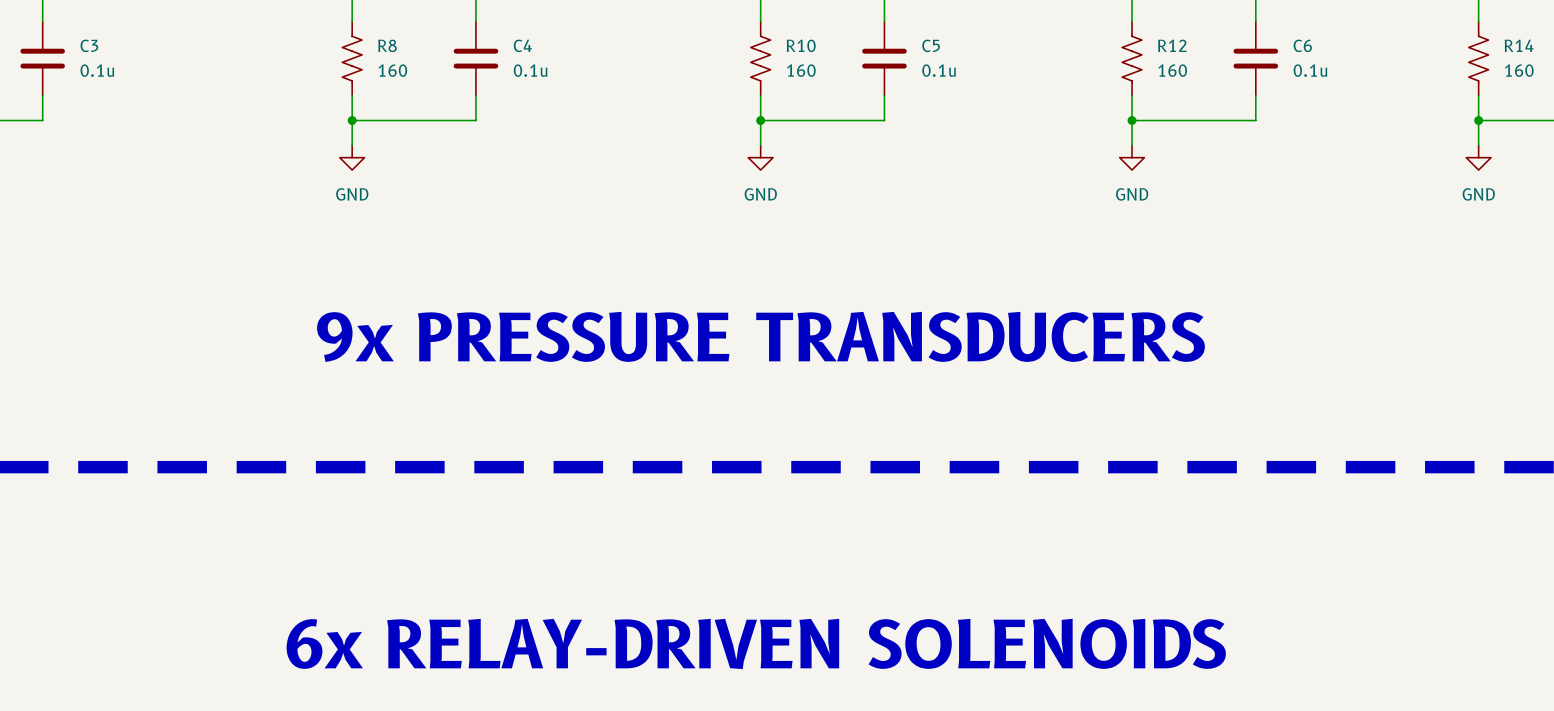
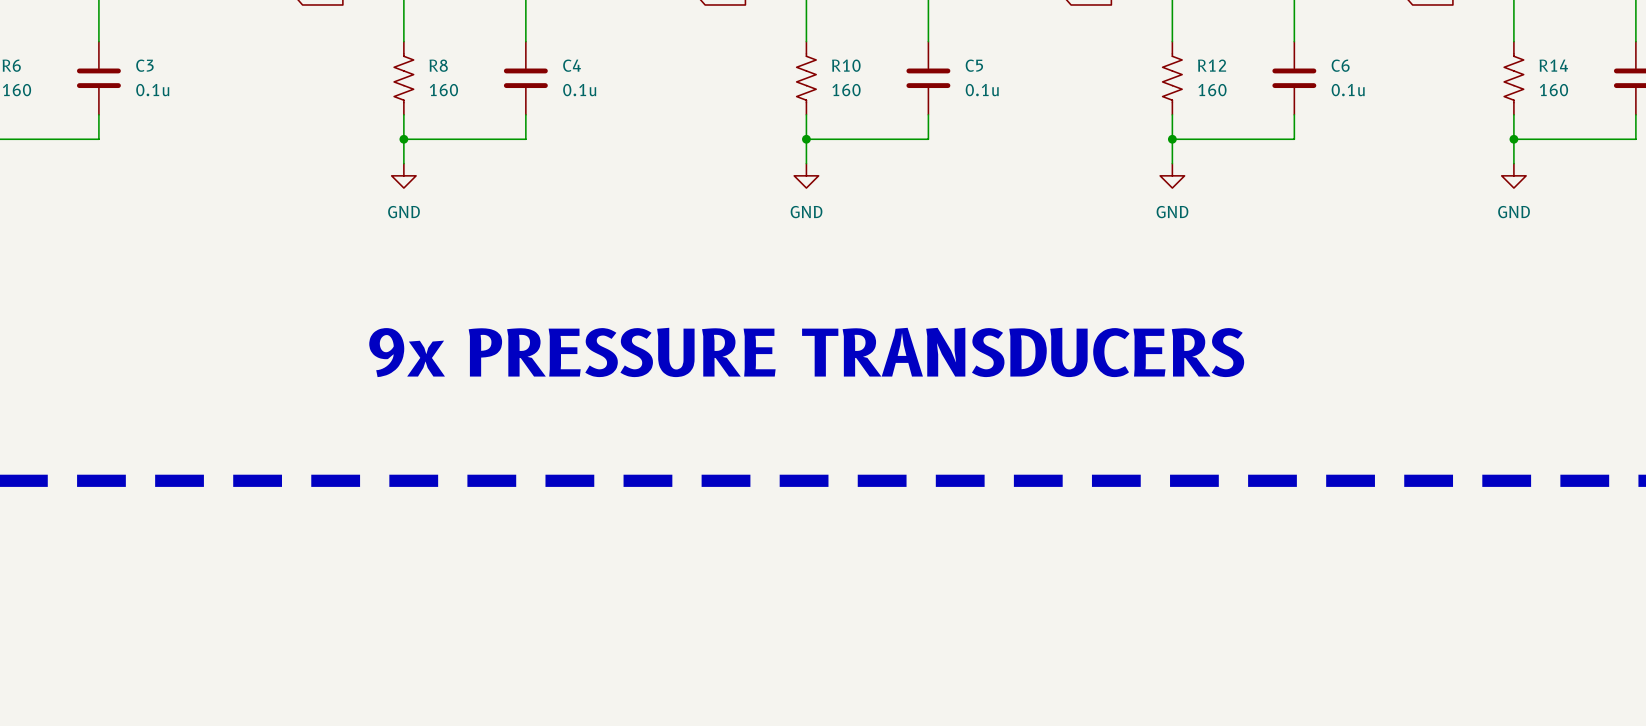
text: 6x RELAY-DRIVEN SOLENOIDS (756, 643) -> none

